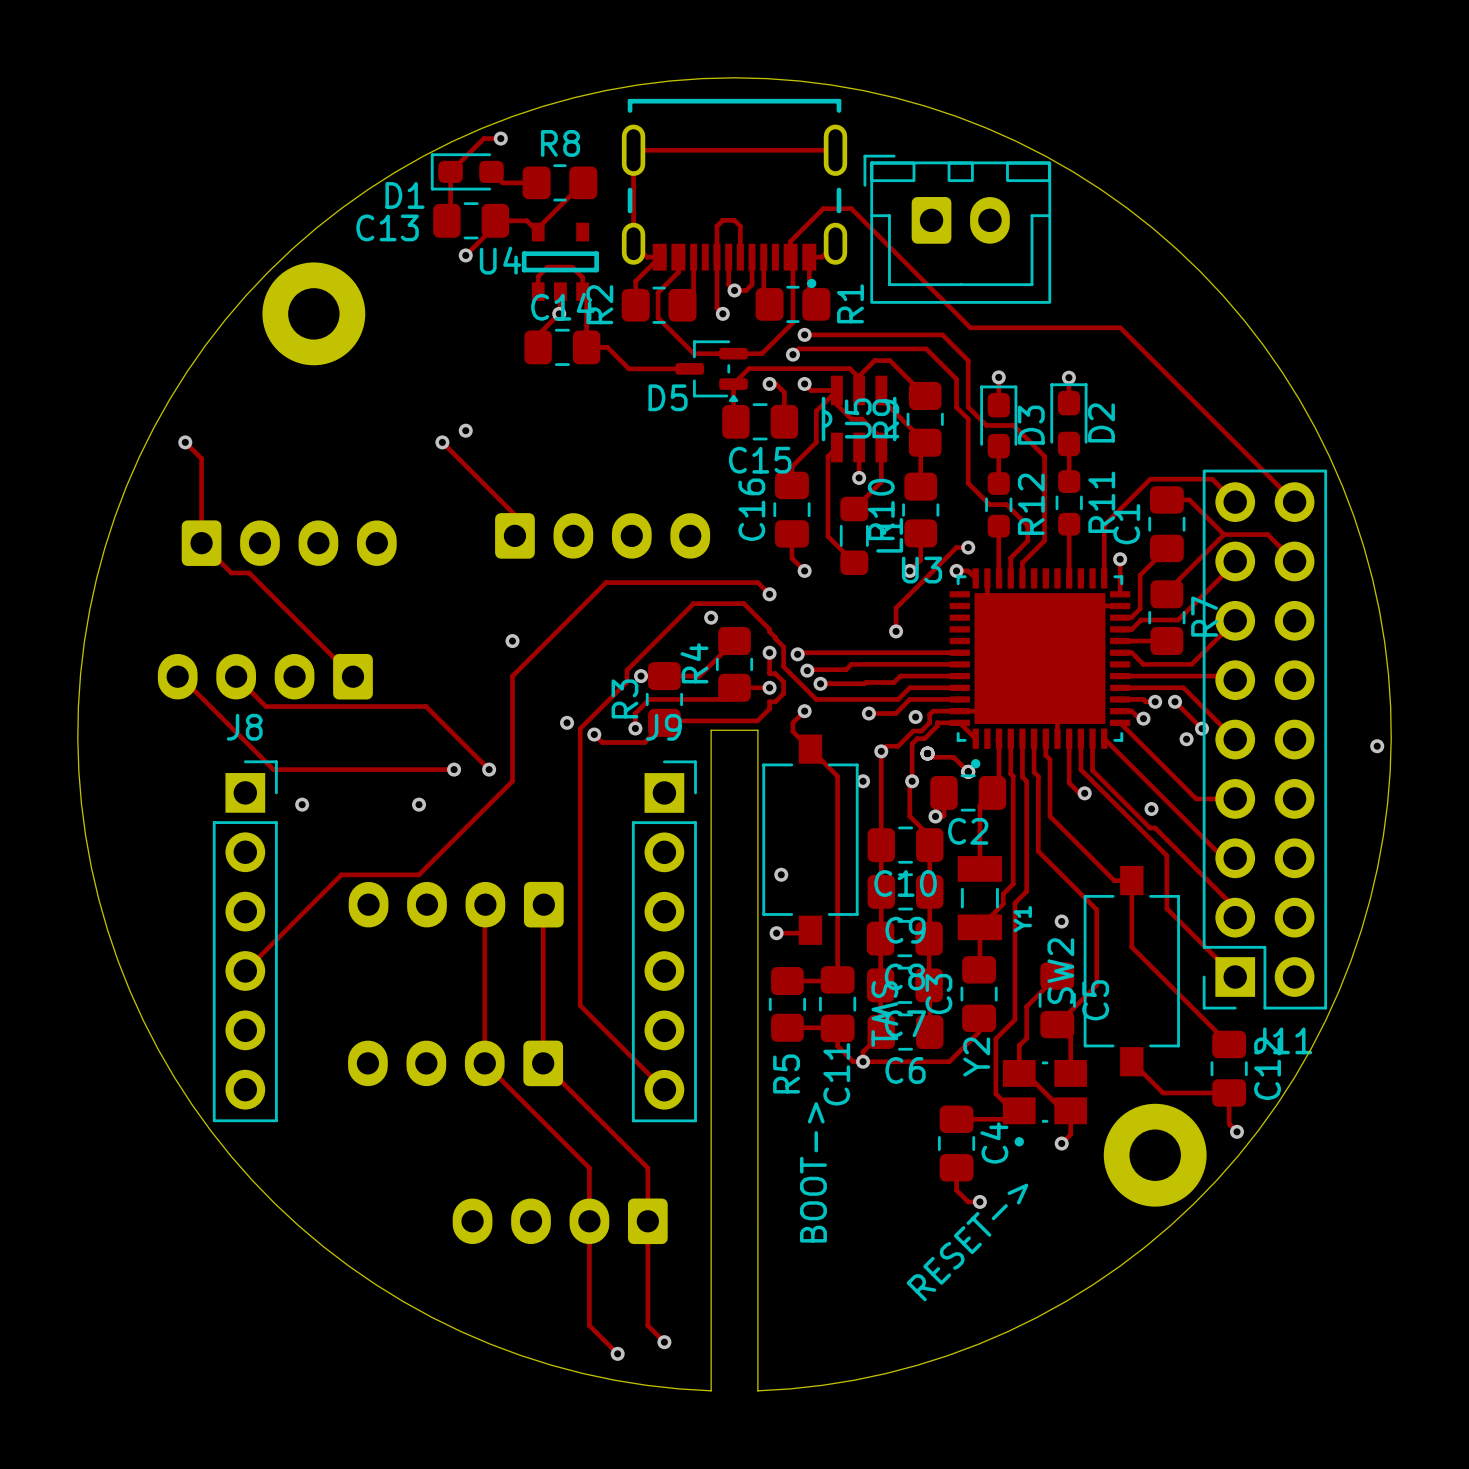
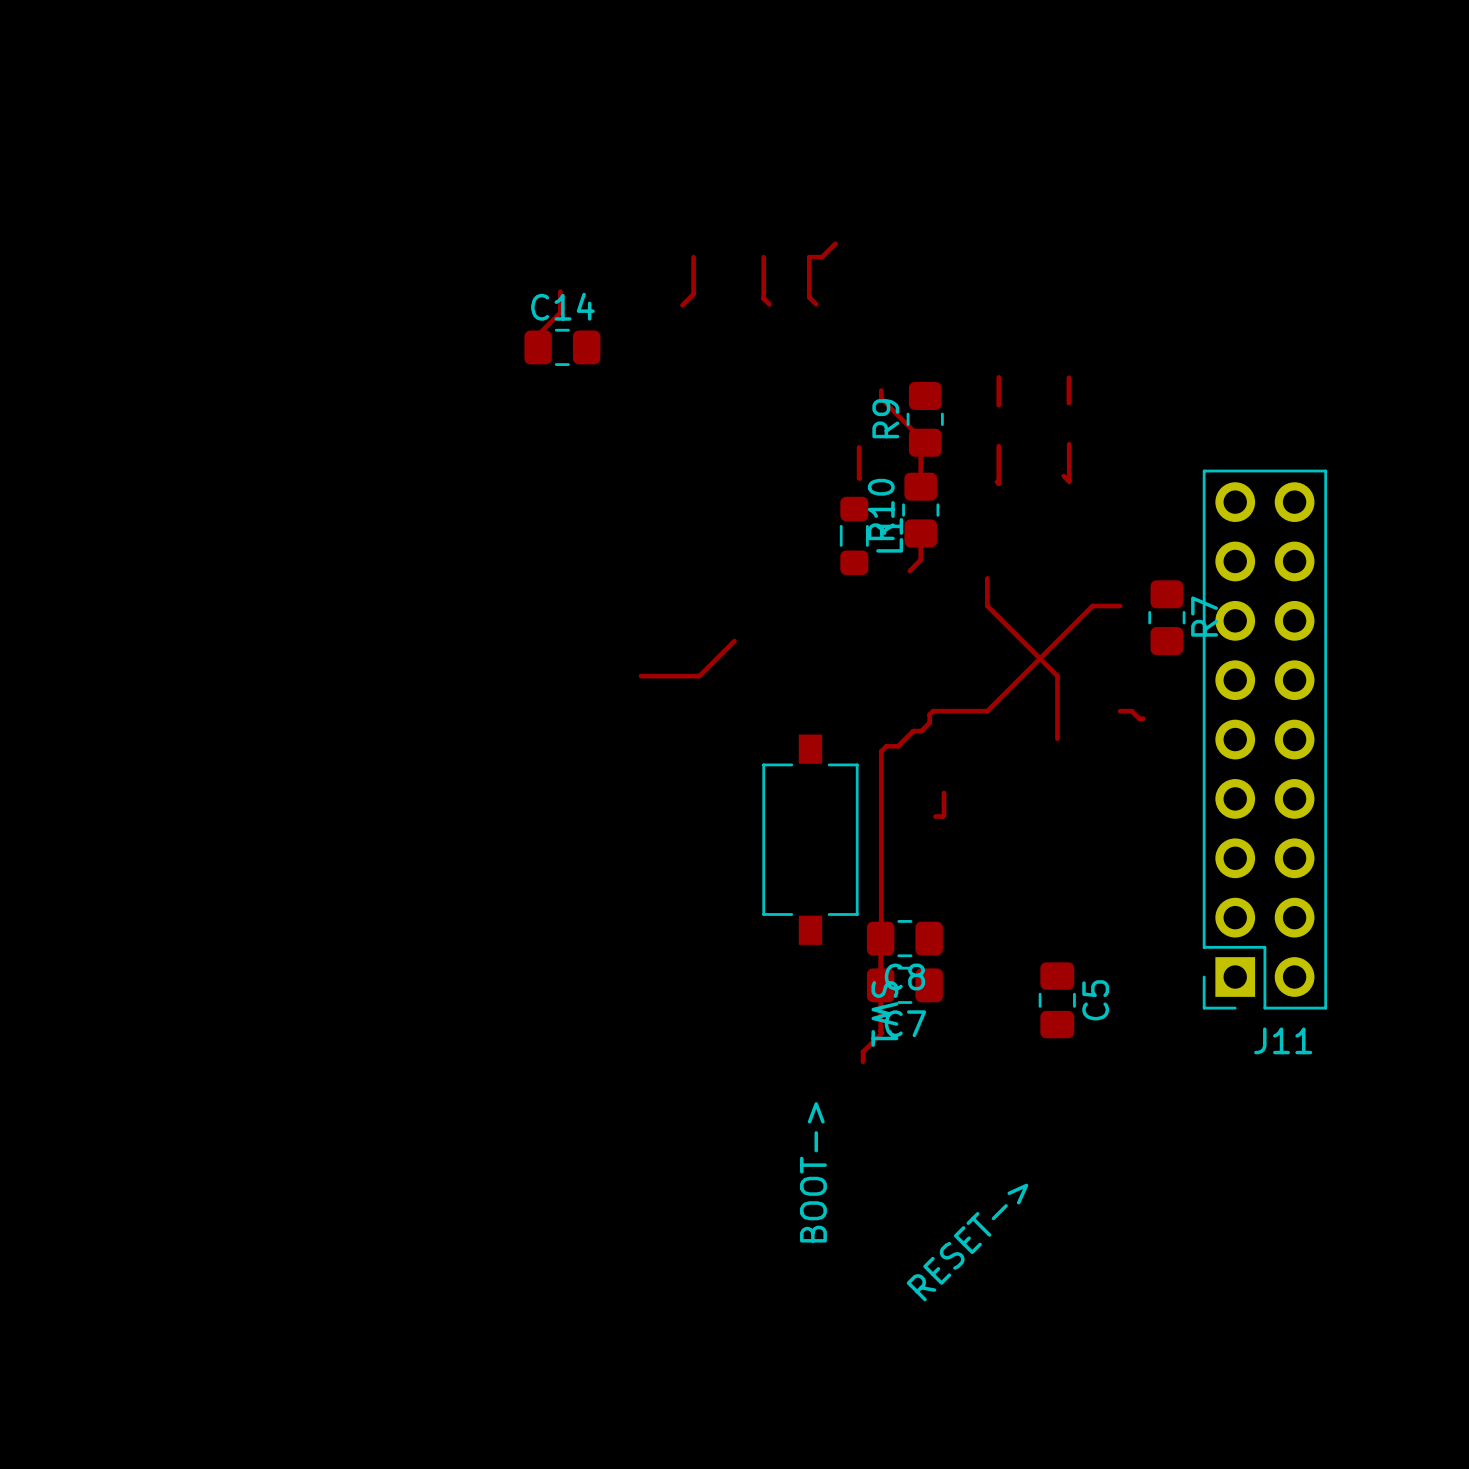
track: (500, 138) (483, 138) (450, 171) (450, 217) (446, 220) -> none
via: (500, 138) -> none
track: (835, 150) (633, 150) (633, 243) (646, 257) (659, 257) (635, 281) (635, 305) -> none
D1: (467, 171) -> none
track: (491, 171) (502, 182) (536, 182) -> none
R8: (559, 182) -> none
track: (583, 182) (538, 227) (538, 232) (526, 220) (495, 220) (495, 225) (465, 255) -> none
part: (734, 193) -> none
C13: (471, 220) -> none
part: (957, 229) -> none
via: (465, 255) -> none
track: (678, 257) (678, 272) (658, 292) (658, 317) (693, 353) (761, 353) (792, 322) (792, 259) (790, 257) (790, 241) (823, 208) (851, 208) (970, 327) (1120, 327) (1294, 502) -> none
track: (728, 257) (728, 284) (734, 290) (746, 290) (752, 284) (752, 257) -> none
track: (740, 257) (740, 226) (734, 220) (722, 220) (716, 226) (716, 308) (722, 313) -> none
U4: (560, 261) -> none
via: (734, 290) -> none
track: (538, 291) (538, 276) (547, 267) (572, 267) (582, 277) (582, 291) (586, 295) (586, 347) (607, 347) (629, 368) (689, 368) -> none
R1: (792, 304) -> none
R2: (659, 305) -> none
part: (313, 313) -> none
via: (559, 313) -> none
via: (722, 313) -> none
track: (804, 334) (942, 334) (968, 360) (968, 407) (986, 425) (1013, 425) (1044, 456) (1044, 540) (1022, 562) (1022, 578) -> none
via: (804, 334) -> none
track: (792, 354) (798, 348) (926, 348) (956, 379) (956, 407) (968, 419) (968, 483) (989, 504) (1006, 504) (1027, 525) (1027, 540) (1010, 557) (1010, 578) -> none
via: (792, 354) -> none
D5: (711, 371) -> none
track: (859, 377) (849, 368) (748, 368) (733, 384) (733, 419) (735, 421) -> none
via: (998, 377) -> none
via: (1068, 377) -> none
track: (769, 383) (775, 383) (784, 392) (784, 421) -> none
via: (769, 383) -> none
track: (804, 383) (811, 390) (836, 390) -> none
via: (804, 383) -> none
track: (836, 390) (836, 404) (851, 419) (861, 419) (881, 438) (881, 481) (854, 509) -> none
track: (836, 390) (816, 411) (816, 442) (791, 466) (791, 485) -> none
track: (859, 390) (859, 376) (874, 360) (889, 360) (925, 395) -> none
U5: (859, 419) -> none
D2: (1068, 419) -> none
C15: (760, 421) -> none
D3: (998, 421) -> none
via: (465, 430) -> none
track: (185, 442) (201, 458) (201, 543) (231, 572) (249, 572) (353, 676) -> none
via: (185, 442) -> none
track: (442, 442) (514, 514) (514, 535) -> none
via: (442, 442) -> none
track: (836, 447) (828, 456) (828, 536) (854, 562) -> none
via: (859, 477) -> none
track: (1166, 499) (1189, 499) (1224, 534) -> none
R11: (1069, 502) -> none
track: (1235, 502) (1212, 479) (1150, 479) (1104, 525) (1104, 578) -> none
R12: (998, 504) -> none
C16: (791, 509) -> none
track: (1069, 524) (1069, 578) -> none
C1: (1166, 524) -> none
track: (998, 526) (998, 578) -> none
track: (791, 533) (791, 558) (804, 570) -> none
track: (1224, 534) (1166, 591) (1166, 594) -> none
track: (1224, 534) (1267, 534) (1294, 561) -> none
part: (602, 535) -> none
part: (289, 543) -> none
track: (968, 547) (956, 547) (896, 608) (896, 631) -> none
via: (968, 547) -> none
track: (1166, 548) (1140, 575) (1140, 608) (1131, 617) (1120, 617) -> none
track: (1120, 559) (1120, 594) -> none
via: (1120, 559) -> none
track: (1235, 561) (1178, 619) (1141, 619) (1131, 629) (1120, 629) -> none
via: (804, 570) -> none
via: (909, 570) -> none
track: (956, 570) (968, 570) (975, 578) -> none
via: (956, 570) -> none
track: (769, 594) (757, 582) (605, 582) (512, 676) (512, 781) (418, 874) (341, 874) (245, 970) -> none
via: (769, 594) -> none
via: (711, 617) -> none
track: (1235, 620) (1191, 664) (1143, 664) (1131, 652) (1120, 652) -> none
via: (896, 631) -> none
via: (512, 641) -> none
track: (1120, 641) (1166, 641) -> none
track: (769, 652) (769, 673) (775, 673) (783, 681) (783, 693) (775, 701) (769, 701) (769, 708) (757, 720) (678, 720) (676, 722) (664, 722) (644, 742) (602, 742) (594, 734) -> none
via: (769, 652) -> none
track: (959, 652) (799, 652) (797, 654) -> none
via: (797, 654) -> none
R4: (734, 664) -> none
track: (959, 664) (851, 664) (846, 669) (807, 670) -> none
U3: (1039, 668) -> none
via: (807, 670) -> none
track: (177, 676) (180, 676) (273, 769) (454, 769) -> none
track: (236, 676) (265, 706) (426, 706) (489, 769) -> none
part: (265, 676) -> none
via: (641, 676) -> none
track: (959, 676) (900, 676) (894, 682) (820, 683) -> none
track: (1120, 676) (1231, 676) (1235, 680) -> none
via: (820, 683) -> none
track: (769, 687) (734, 687) (722, 699) (649, 699) (635, 713) (635, 728) -> none
via: (769, 687) -> none
track: (959, 687) (909, 687) (898, 699) (816, 699) (783, 666) (783, 646) (769, 629) (743, 603) (693, 603) (626, 670) (626, 681) (580, 728) (580, 1005) (664, 1089) -> none
track: (1120, 687) (1183, 687) (1235, 739) -> none
R3: (664, 699) -> none
track: (959, 699) (909, 699) (895, 713) (868, 713) -> none
track: (1120, 699) (1143, 699) (1145, 701) (1155, 701) -> none
via: (1155, 701) -> none
track: (1175, 701) (1201, 728) -> none
via: (1175, 701) -> none
track: (804, 711) (792, 722) (792, 731) (837, 776) (837, 979) (787, 981) -> none
via: (804, 711) -> none
via: (868, 713) -> none
via: (915, 717) -> none
via: (1143, 718) -> none
via: (567, 722) -> none
track: (1120, 722) (1196, 798) (1235, 798) -> none
via: (635, 728) -> none
via: (1202, 728) -> none
via: (594, 734) -> none
track: (975, 738) (959, 722) (937, 722) (937, 726) (924, 738) (917, 738) (912, 743) (909, 816) (929, 836) (929, 1032) -> none
track: (1010, 738) (1010, 773) (1013, 776) (1013, 884) (1003, 894) (1003, 903) (979, 927) (979, 969) -> none
track: (1022, 738) (1022, 777) (1026, 781) (1026, 891) (1014, 903) (1014, 1019) (995, 1038) (995, 1093) (1012, 1110) (1019, 1110) (1010, 1119) (956, 1119) -> none
track: (1034, 738) (1034, 772) (1038, 776) (1038, 851) (1096, 909) (1096, 985) (1057, 1024) (1070, 1037) (1070, 1073) -> none
track: (1045, 738) (1045, 755) (1050, 759) (1050, 816) (1114, 880) (1131, 880) (1131, 947) (1229, 1044) -> none
track: (1069, 738) (1069, 782) (1079, 793) (1084, 793) -> none
track: (1080, 738) (1080, 769) (1166, 855) (1166, 908) (1235, 977) -> none
track: (1092, 738) (1092, 770) (1150, 828) (1155, 828) (1235, 908) (1235, 917) -> none
track: (1104, 738) (1223, 858) (1235, 858) -> none
via: (1186, 739) -> none
track: (997, 740) (999, 738) (999, 786) (979, 805) (979, 868) -> none
via: (1377, 746) -> none
via: (881, 751) -> none
track: (927, 753) (928, 757) (953, 757) (968, 771) -> none
via: (927, 753) -> none
via: (454, 769) -> none
via: (489, 769) -> none
via: (968, 771) -> none
via: (863, 781) -> none
via: (912, 781) -> none
C2: (968, 792) -> none
via: (1084, 793) -> none
via: (302, 804) -> none
via: (419, 804) -> none
via: (1151, 808) -> none
via: (935, 816) -> none
C10: (905, 845) -> none
via: (781, 874) -> none
C9: (905, 891) -> none
Y1: (979, 898) -> none
part: (456, 904) -> none
track: (485, 904) (484, 1063) (589, 1168) (589, 1325) (617, 1353) -> none
track: (543, 904) (543, 1063) -> none
via: (1061, 921) -> none
track: (810, 930) (807, 933) (776, 933) -> none
via: (776, 933) -> none
J8: (245, 941) -> none
J9: (664, 941) -> none
SW2: (1131, 971) -> none
track: (1057, 976) (1026, 1006) (1026, 1038) (1019, 1045) (1019, 1073) (1025, 1073) (1063, 1110) (1070, 1110) (1070, 1134) (1061, 1143) -> none
C3: (979, 994) -> none
R5: (787, 1004) -> none
C11: (837, 1004) -> none
track: (979, 1018) (979, 1032) (949, 1061) (853, 1061) (837, 1046) (836, 1027) (787, 1027) -> none
C6: (905, 1032) -> none
via: (863, 1061) -> none
track: (1131, 1061) (1163, 1092) (1229, 1092) (1229, 1124) (1236, 1131) -> none
part: (455, 1063) -> none
track: (543, 1063) (647, 1168) (647, 1325) (664, 1342) -> none
C12: (1229, 1068) -> none
Y2: (1044, 1103) -> none
via: (1236, 1131) -> none
C4: (956, 1143) -> none
via: (1061, 1143) -> none
part: (1155, 1155) -> none
track: (956, 1167) (956, 1190) (968, 1201) (979, 1201) -> none
via: (979, 1201) -> none
part: (560, 1221) -> none
via: (664, 1342) -> none
via: (617, 1353) -> none
board edge: (757, 1390) (790, 1388) (822, 1385) (886, 1373) (948, 1355) (1008, 1331) (1065, 1301) (1119, 1266) (1170, 1225) (1216, 1180) (1258, 1130) (1294, 1077) (1325, 1020) (1350, 960) (1370, 899) (1383, 835) (1390, 771) (1390, 706) (1384, 642) (1372, 578) (1354, 516) (1329, 456) (1299, 399) (1263, 345) (1222, 295) (1177, 249) (1127, 208) (1073, 172) (1016, 141) (956, 116) (894, 97) (831, 84) (766, 78) (702, 78) (637, 84) (574, 97) (512, 116) (452, 141) (395, 172) (341, 208) (291, 249) (246, 295) (205, 345) (169, 399) (139, 456) (115, 516) (96, 578) (84, 642) (78, 706) (78, 771) (85, 835) (98, 899) (118, 960) (143, 1020) (174, 1077) (210, 1130) (252, 1180) (274, 1203) (323, 1246) (375, 1284) (431, 1317) (490, 1344) (551, 1365) (614, 1380) (678, 1388) (711, 1390) (711, 730) (757, 730) (757, 1390) -> none

